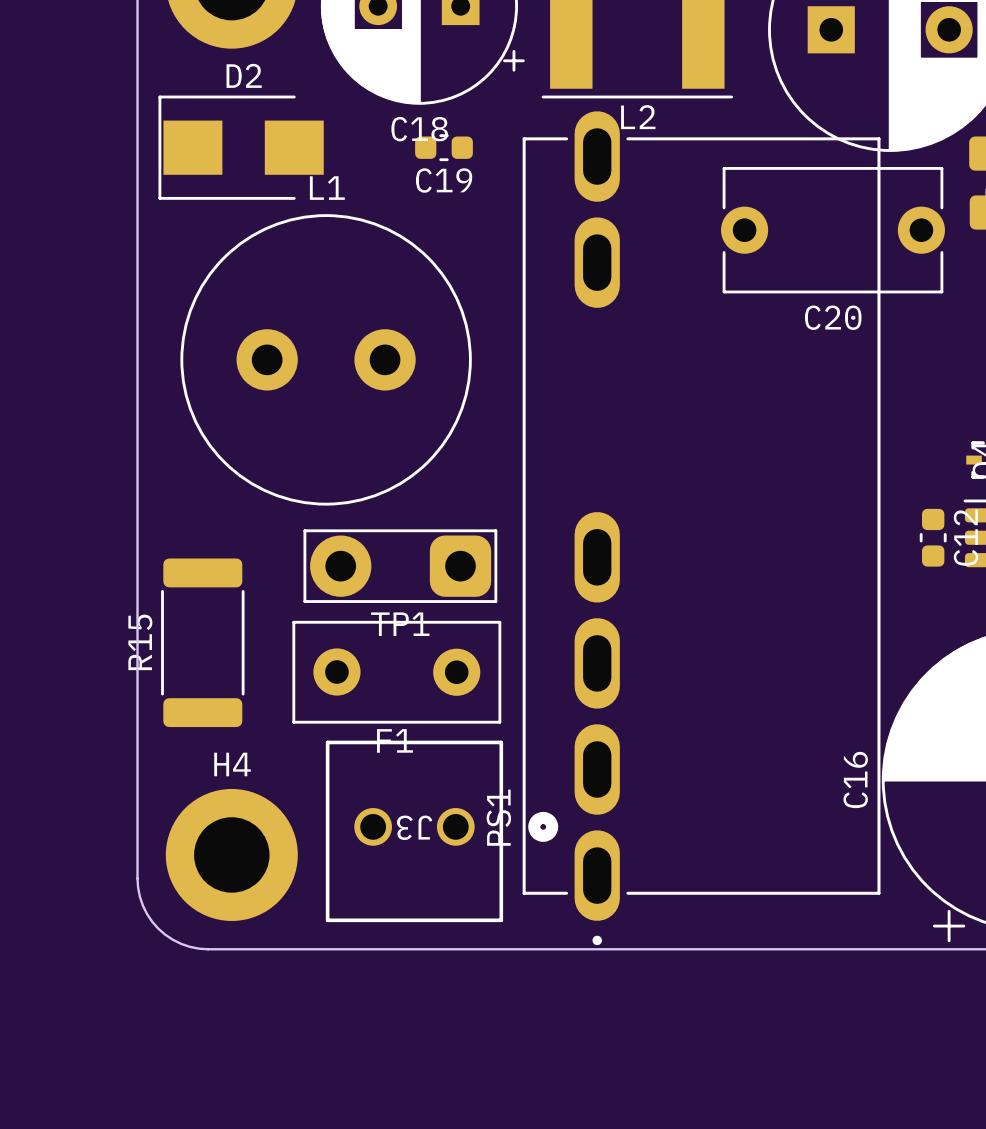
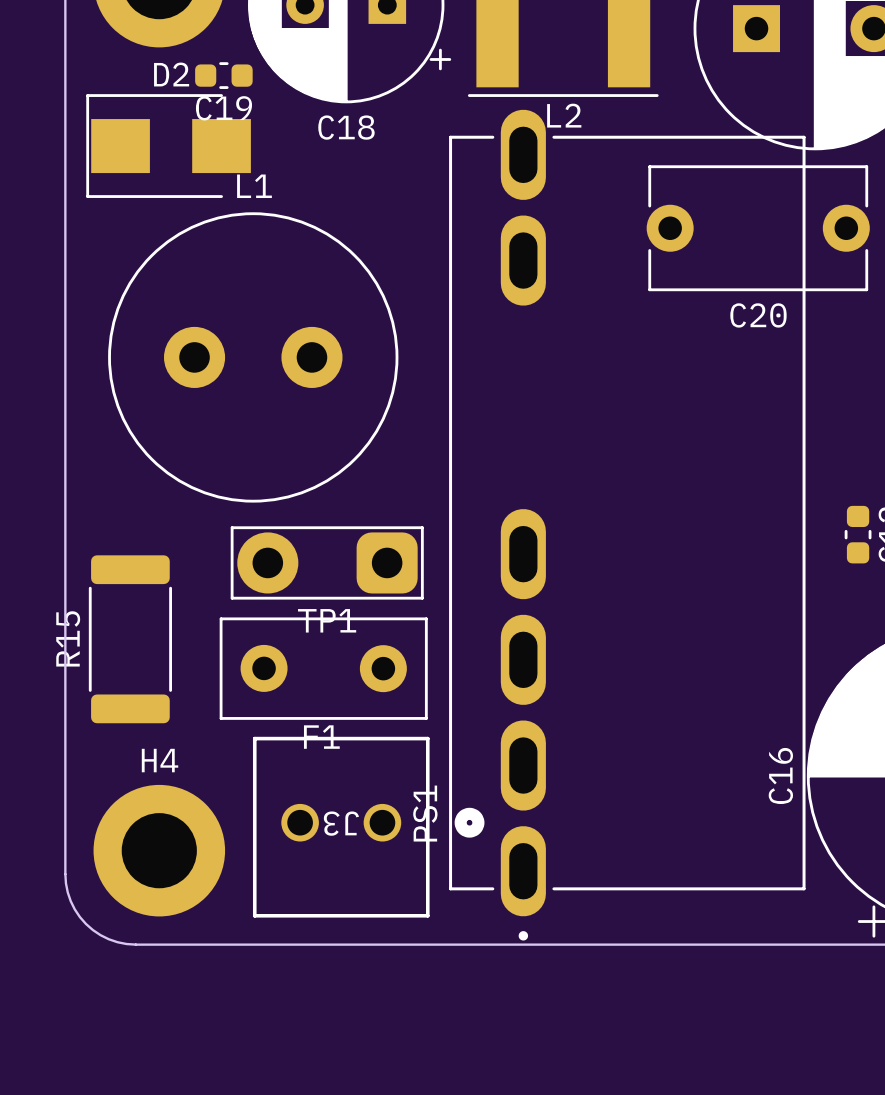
C19 position: (443, 147) -> (223, 75)

